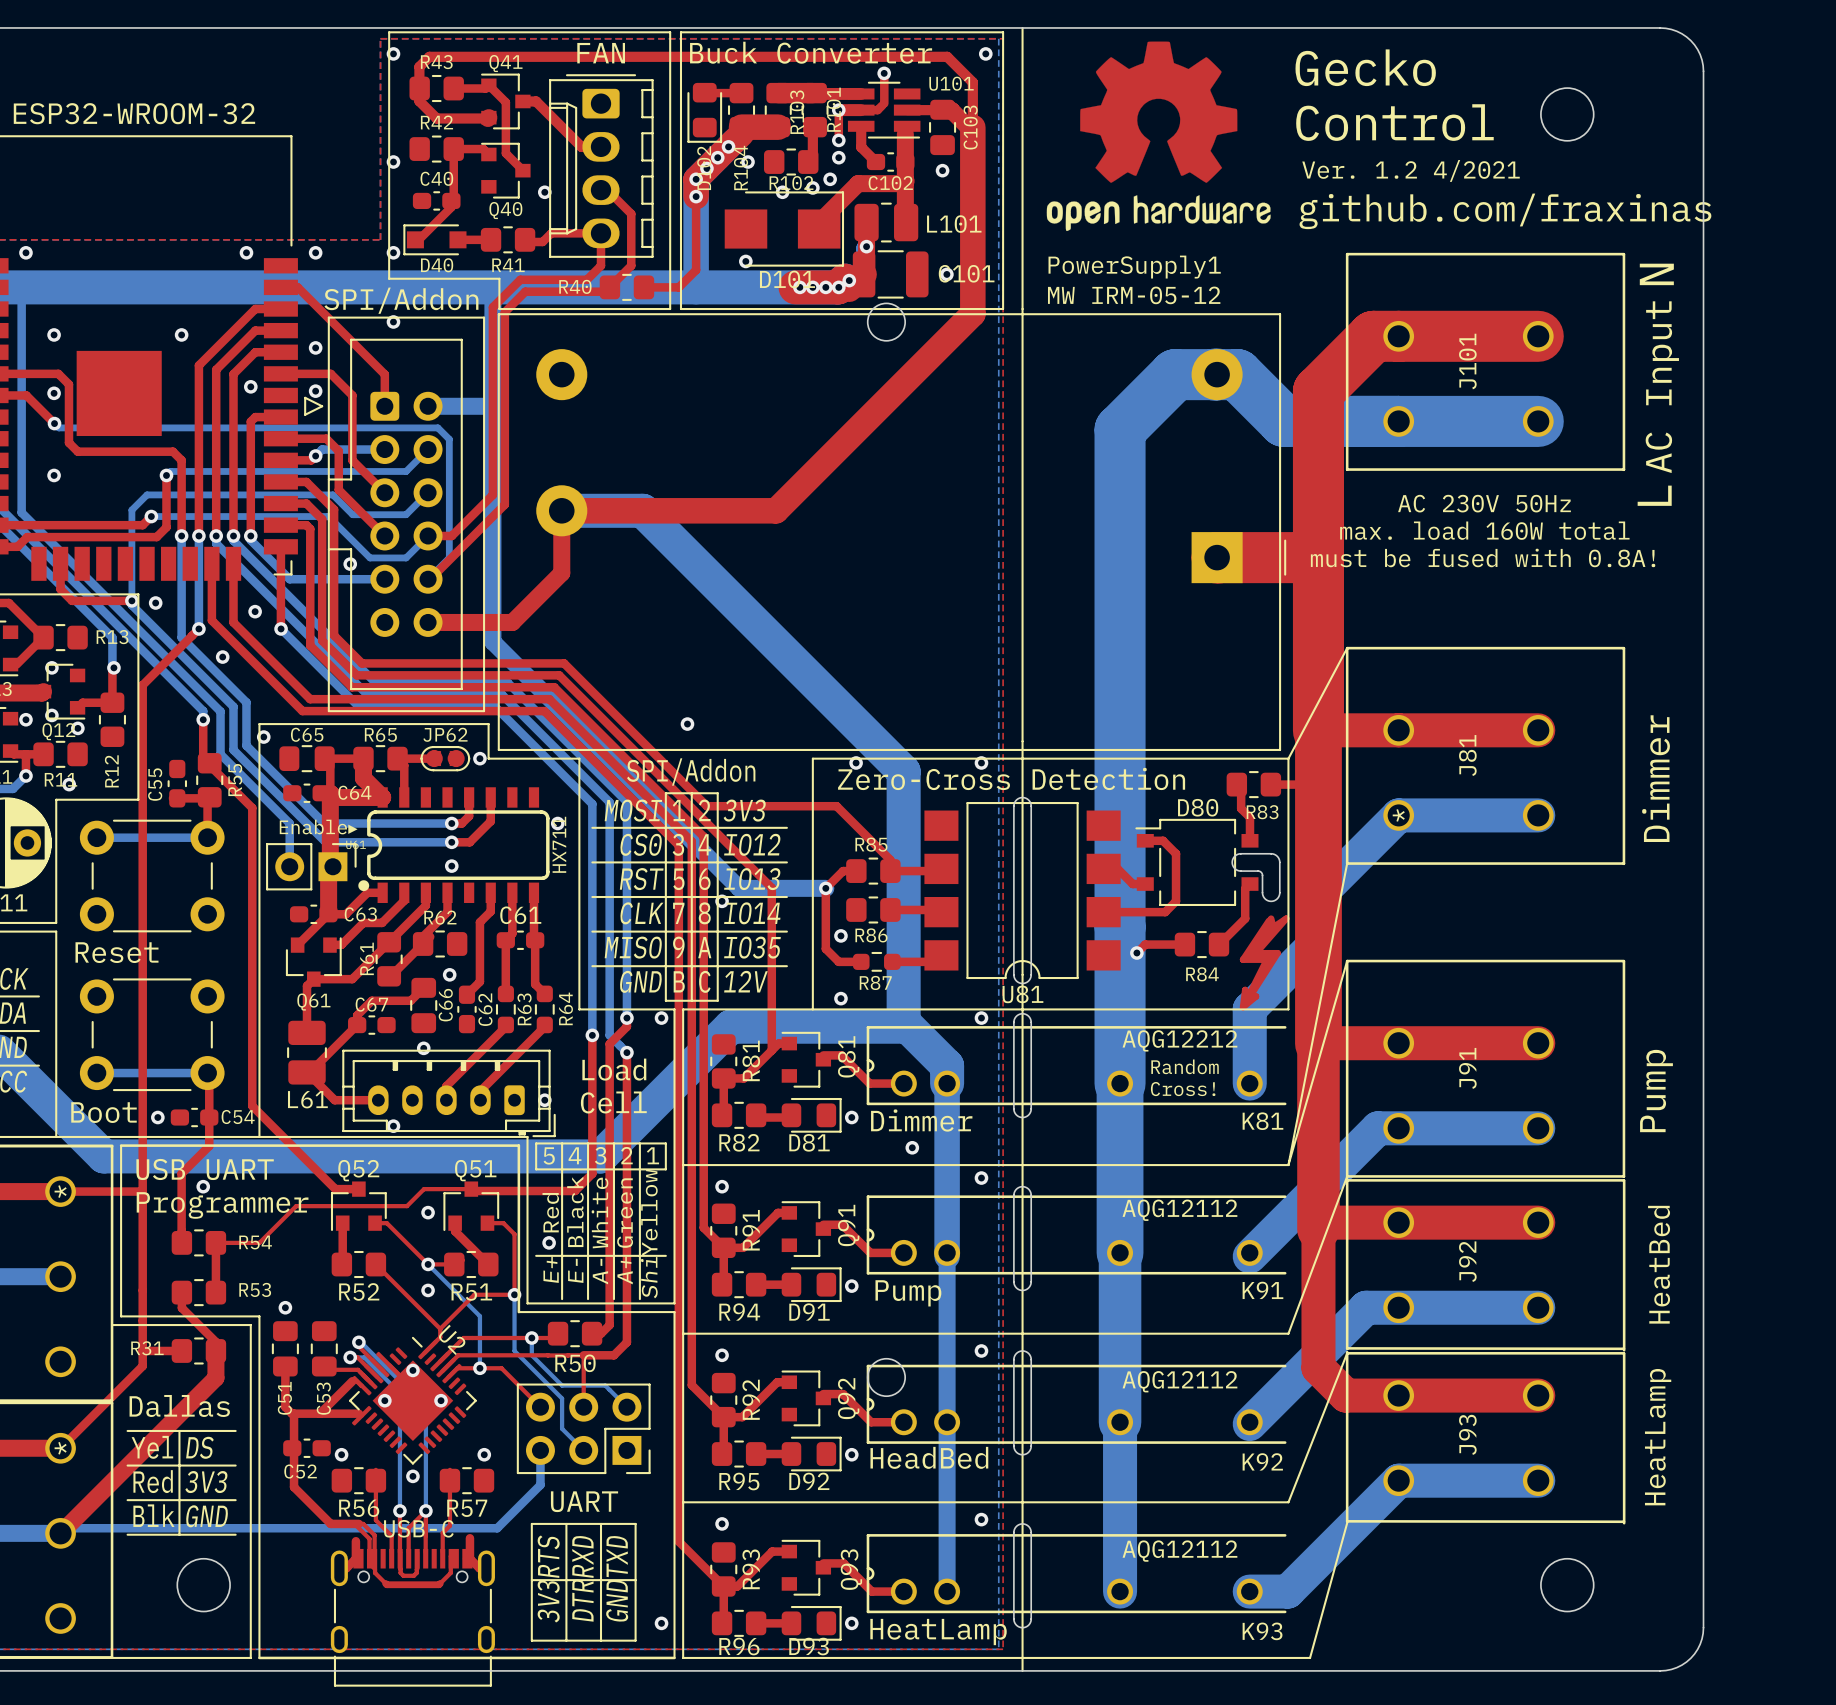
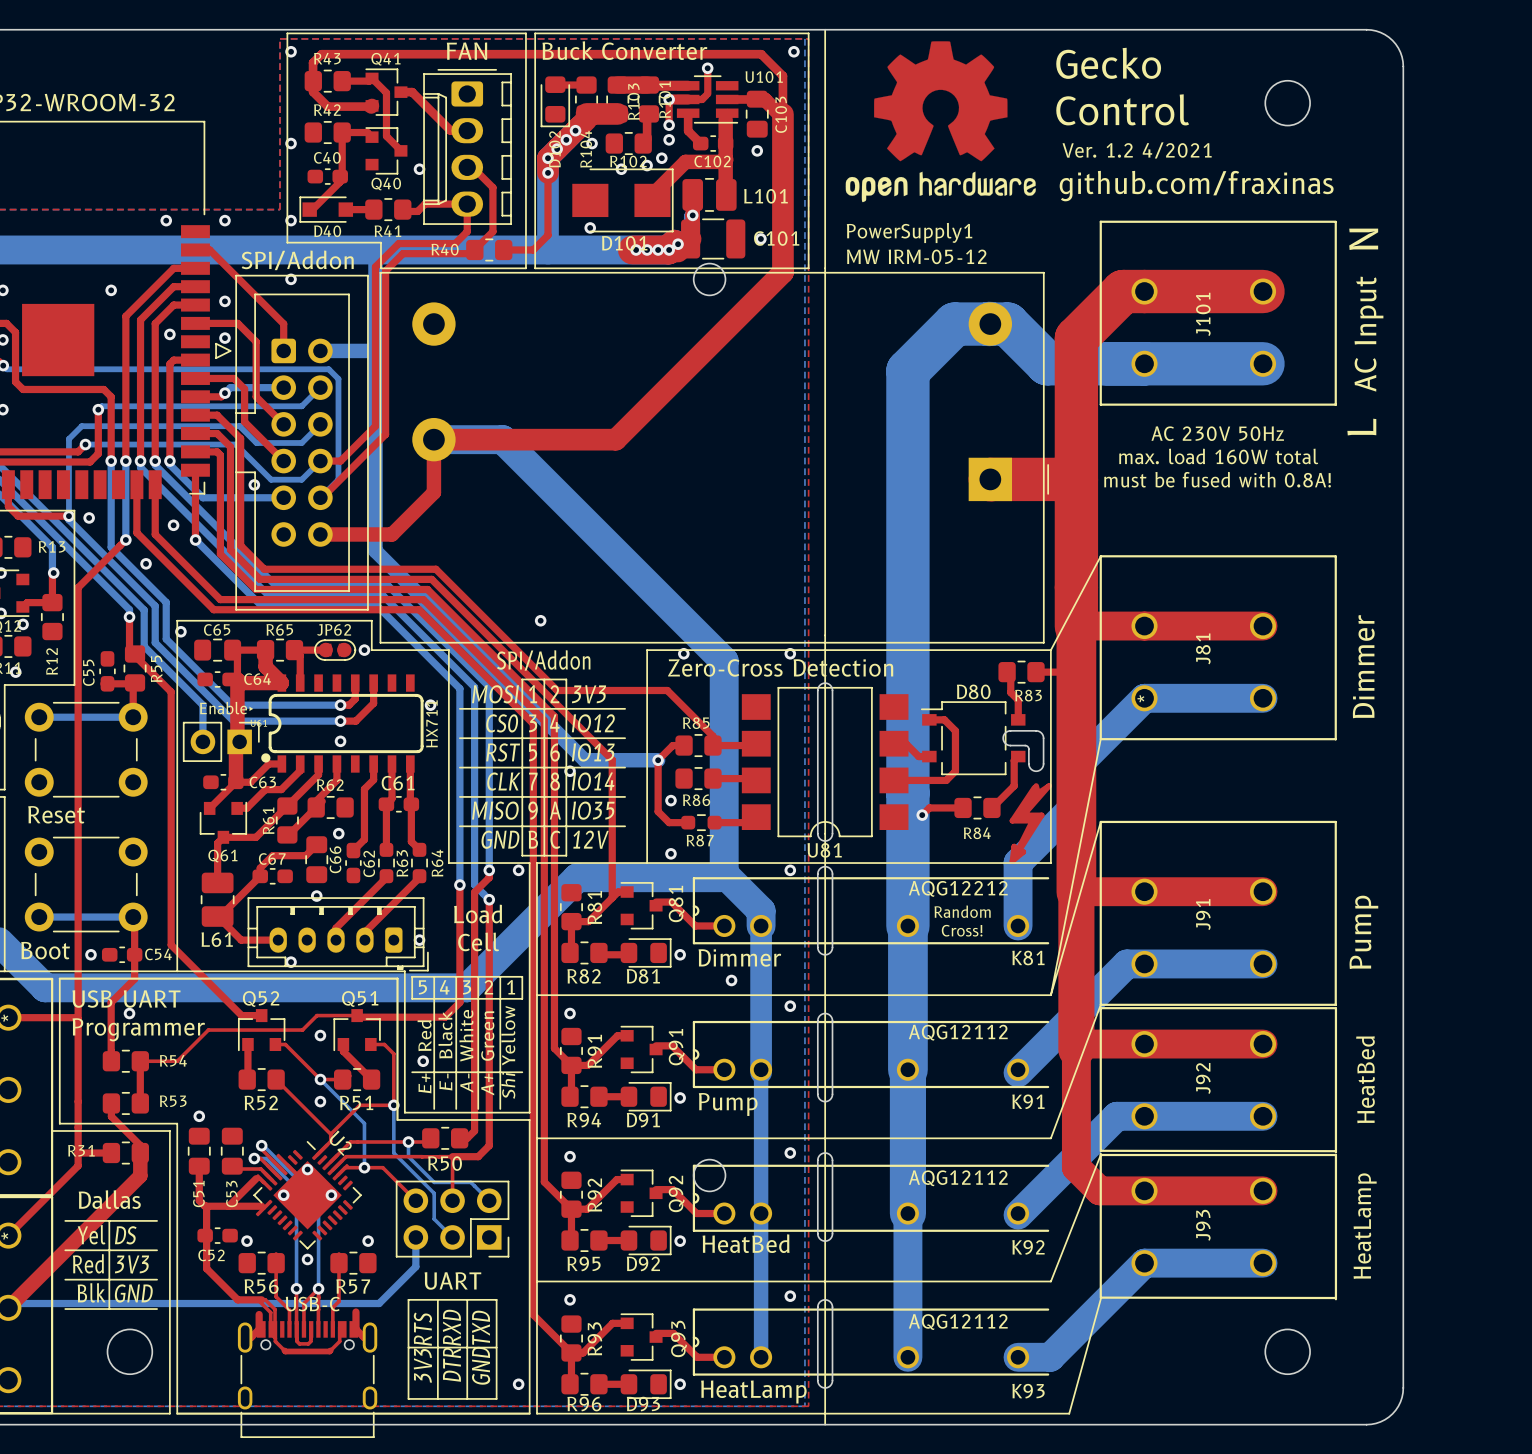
text: HeadBed (929, 1457) -> HeatBed (746, 1243)

